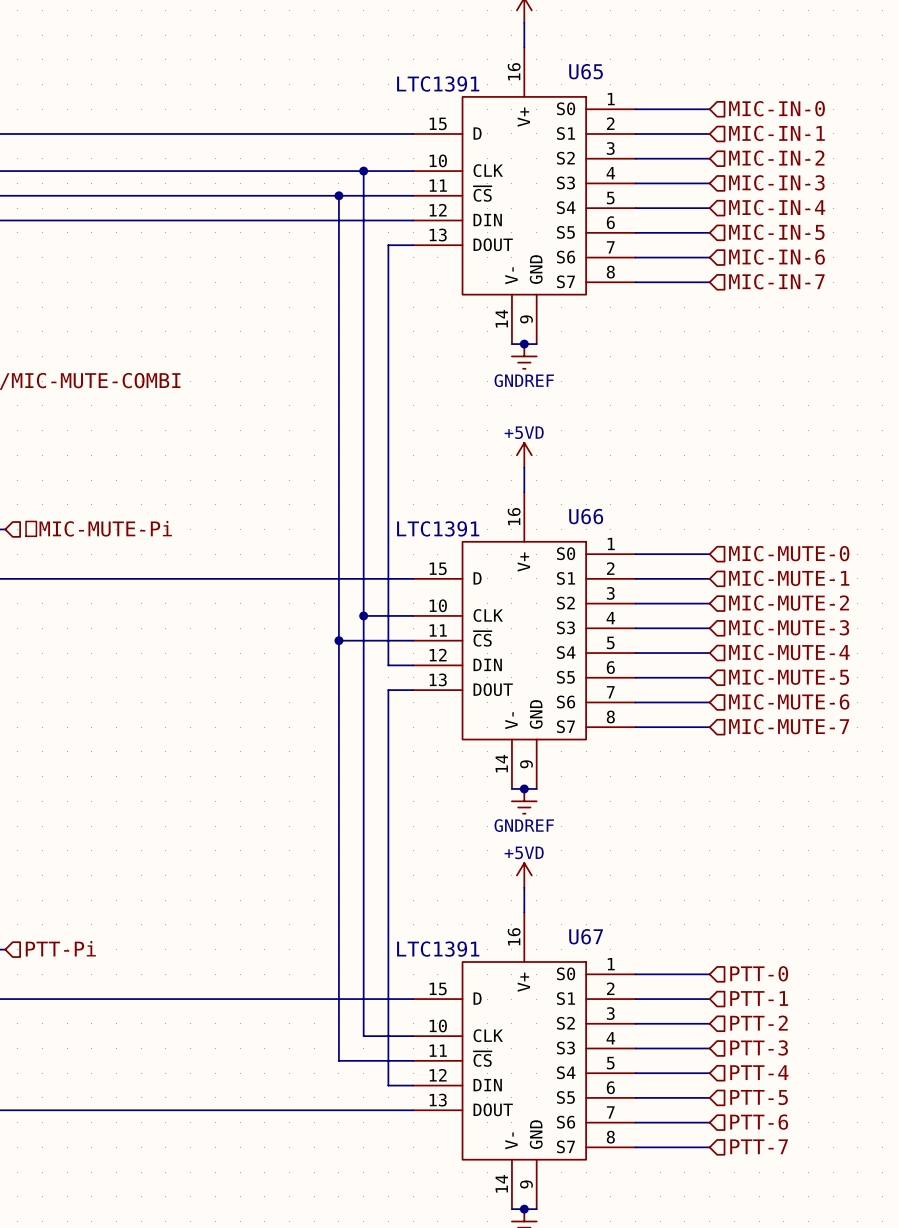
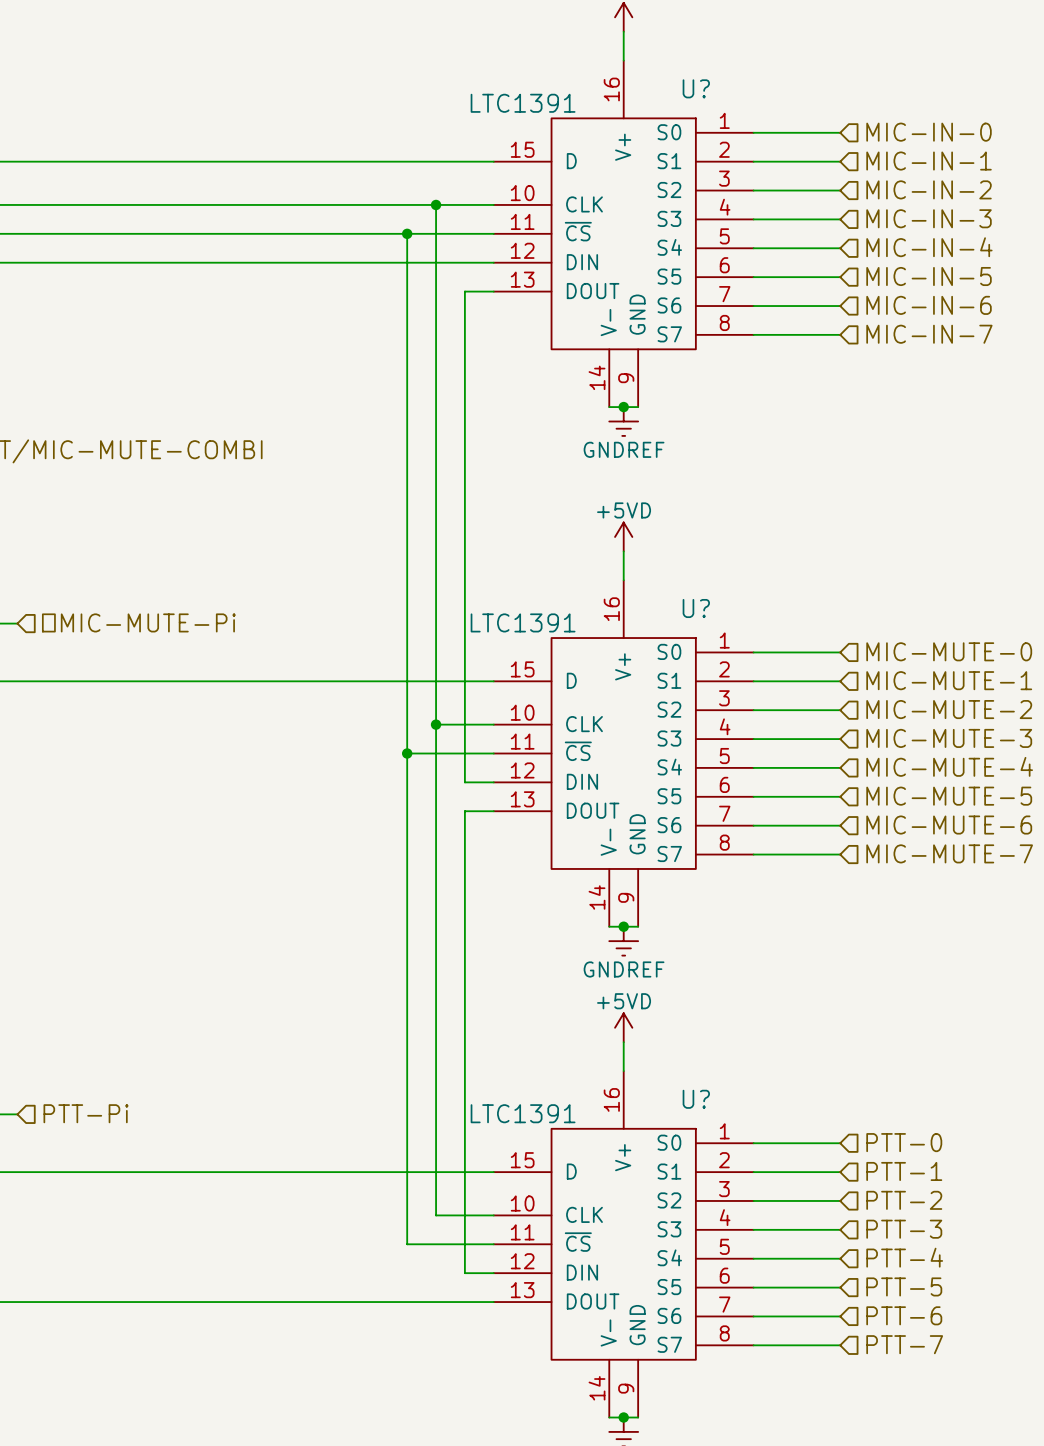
U65 name: U65 (586, 71) -> U? (696, 88)
U66 name: U66 (586, 516) -> U? (696, 608)
U67 name: U67 (586, 936) -> U? (696, 1099)

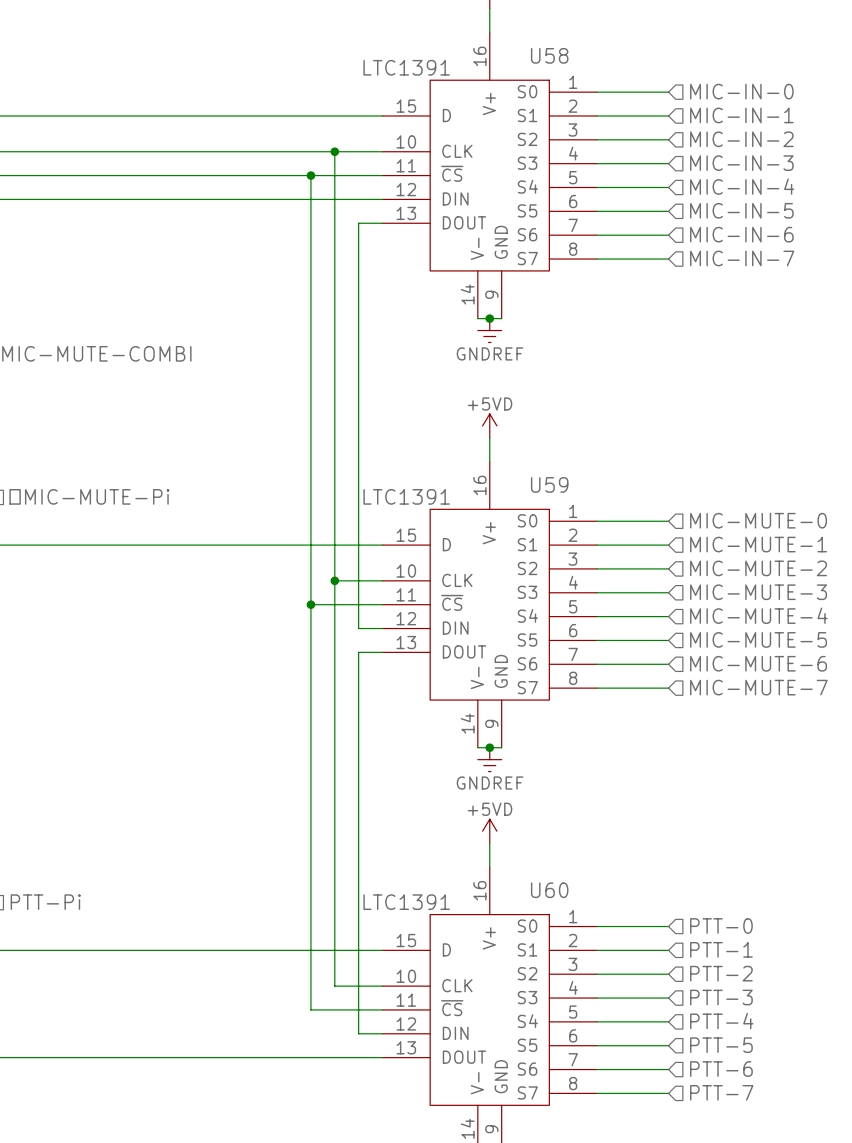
U? name: U? (696, 88) -> U58 (549, 55)
U? name: U? (696, 608) -> U59 (549, 484)
U? name: U? (696, 1099) -> U60 (549, 890)

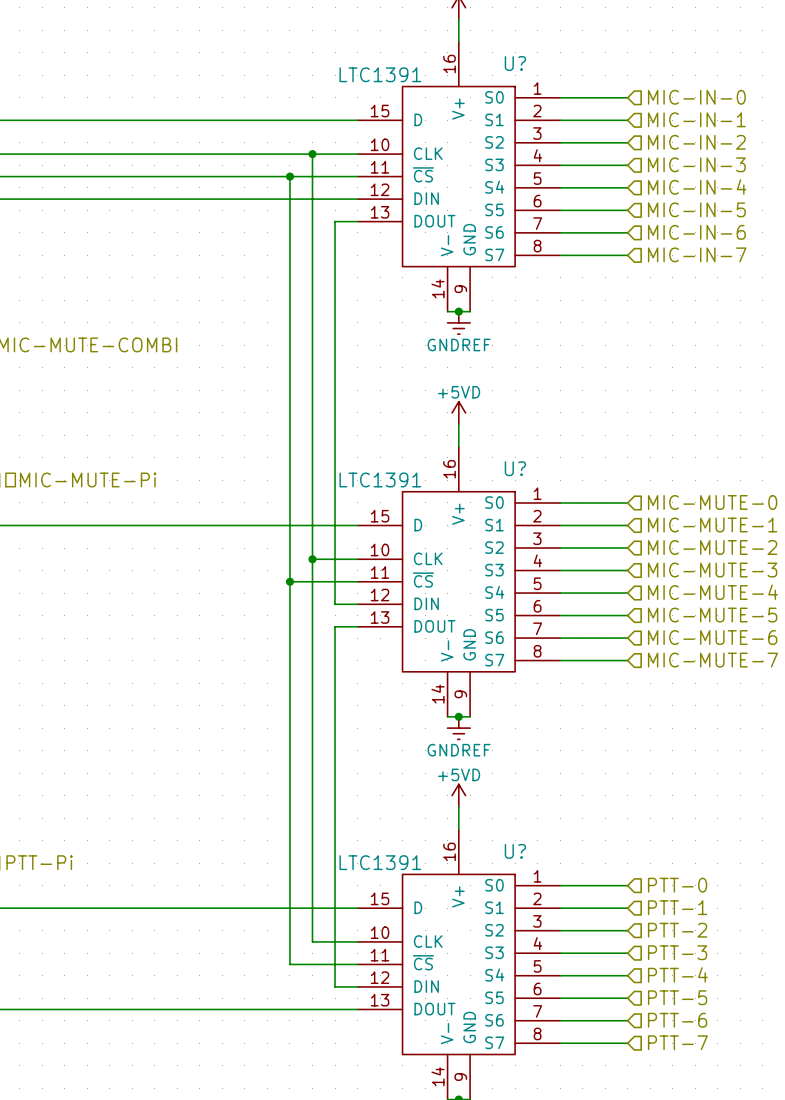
U58 name: U58 (549, 55) -> U? (515, 63)
U59 name: U59 (549, 484) -> U? (515, 468)
U60 name: U60 (549, 890) -> U? (515, 851)

